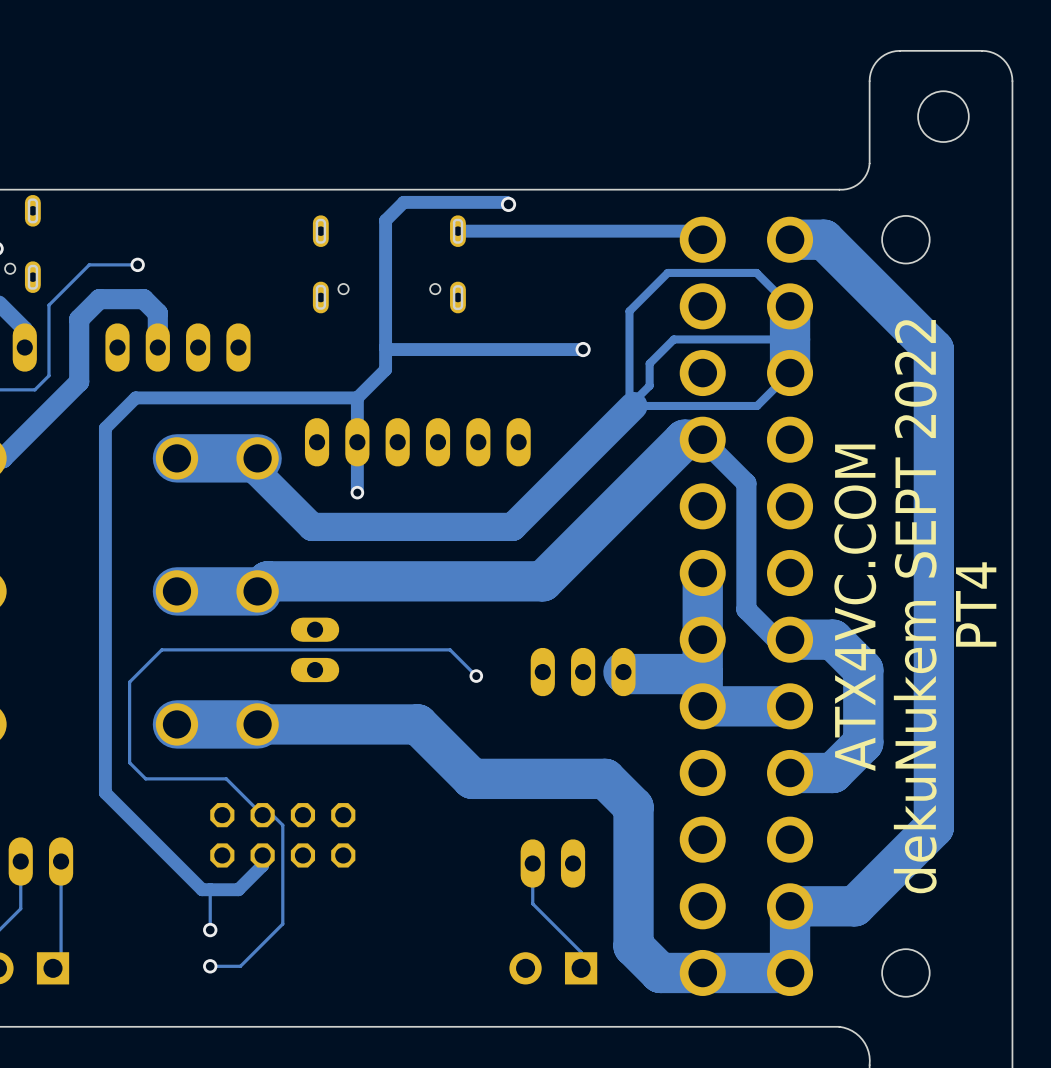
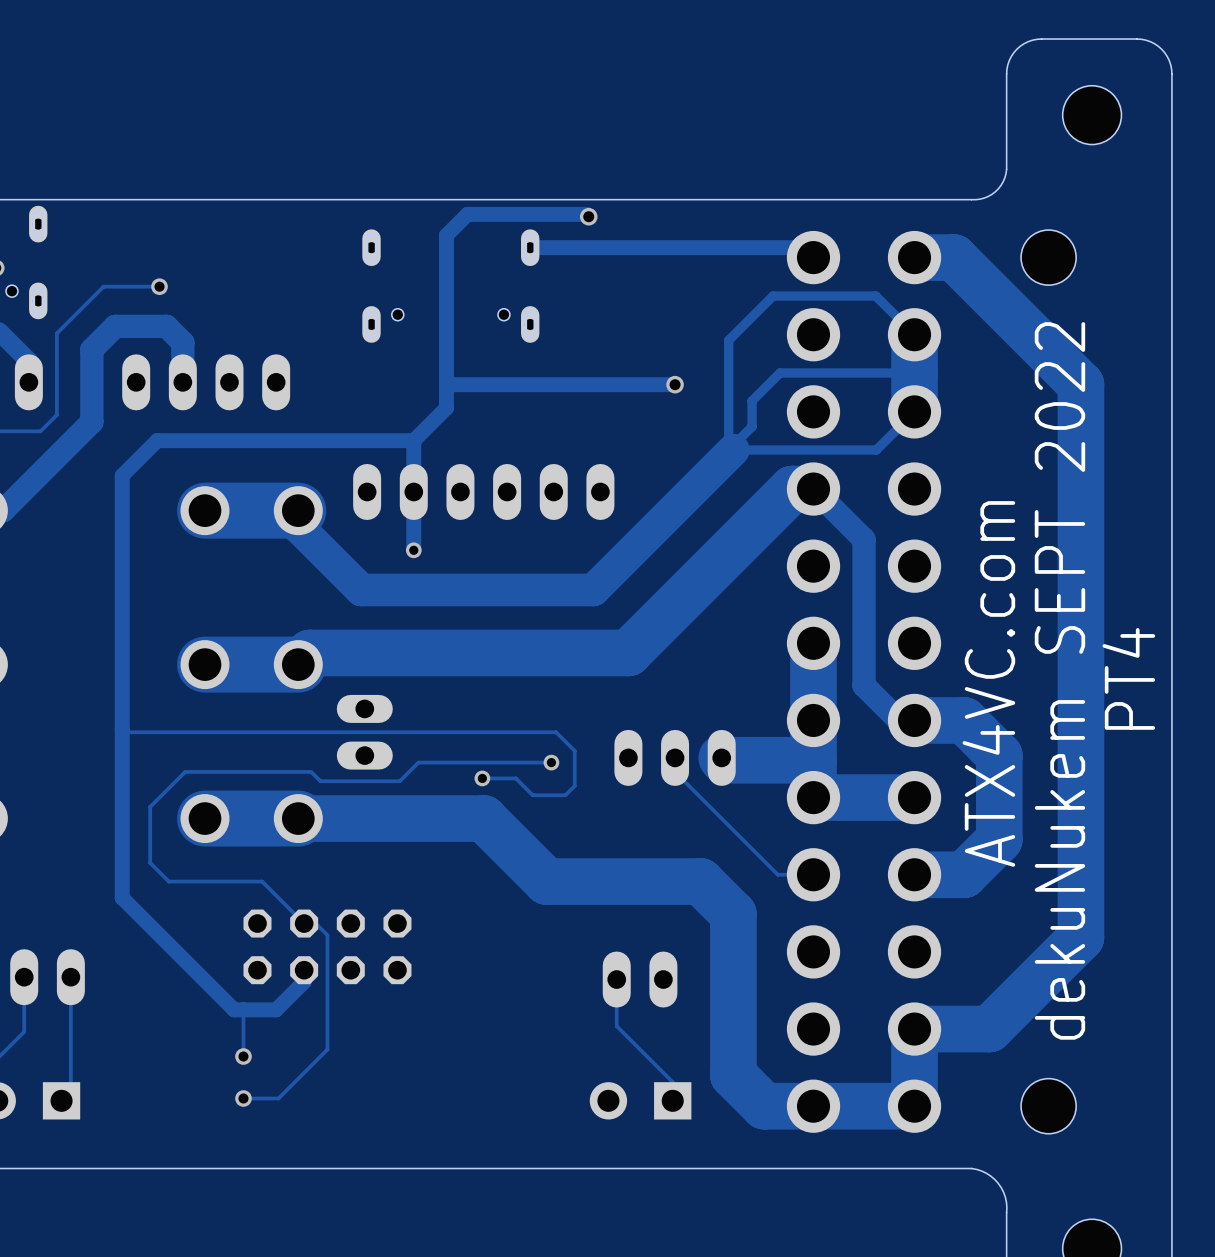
text: ATX4VC.COM (855, 607) -> ATX4VC.com (988, 683)
track: (161, 649) (129, 682) (129, 714) -> (187, 732) (124, 732) (122, 729)
track: (450, 649) (476, 676) -> (521, 732) (556, 732) (574, 750) (574, 785) (565, 795) (532, 795) (515, 778) (482, 778)
track: none -> (675, 757) (675, 771) (777, 874) (813, 874)
track: none -> (551, 762) (418, 762) (399, 781) (320, 781) (311, 771) (185, 771) (150, 806)
via: none -> (482, 778)

